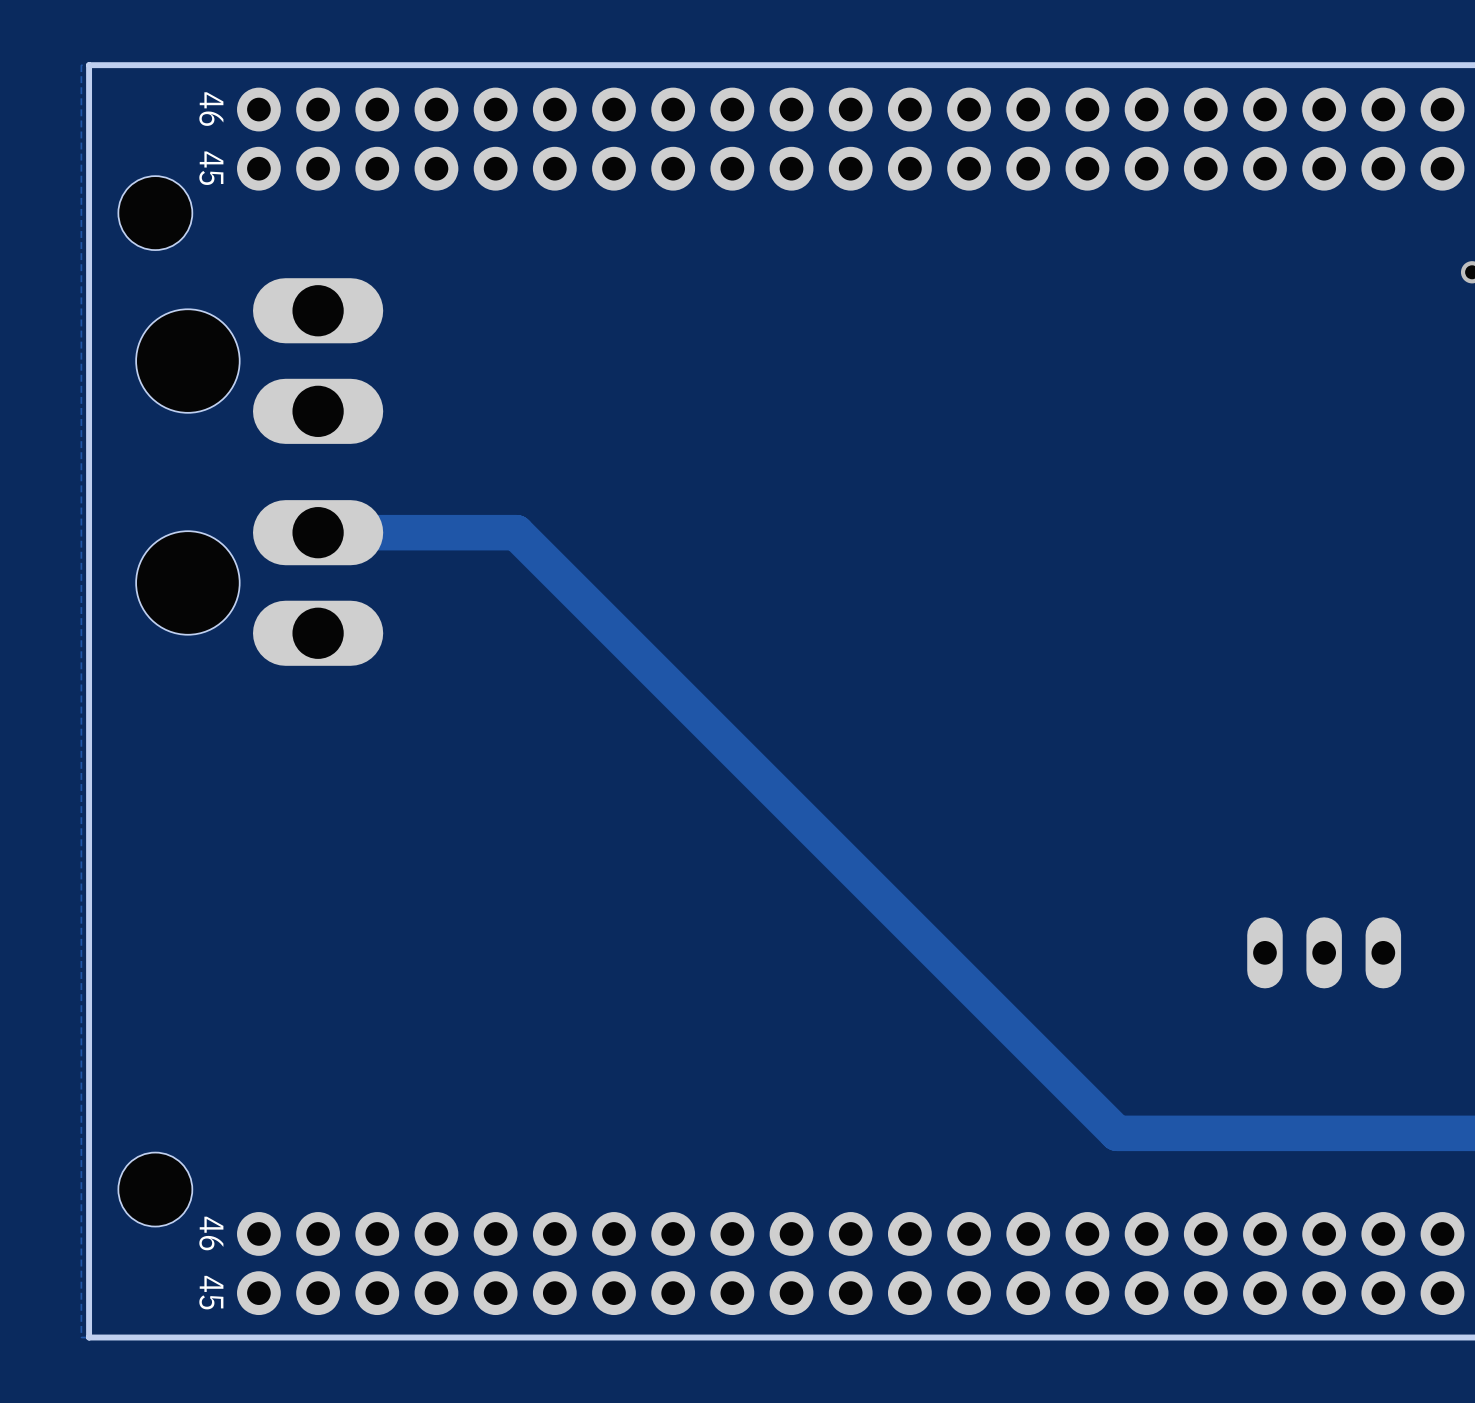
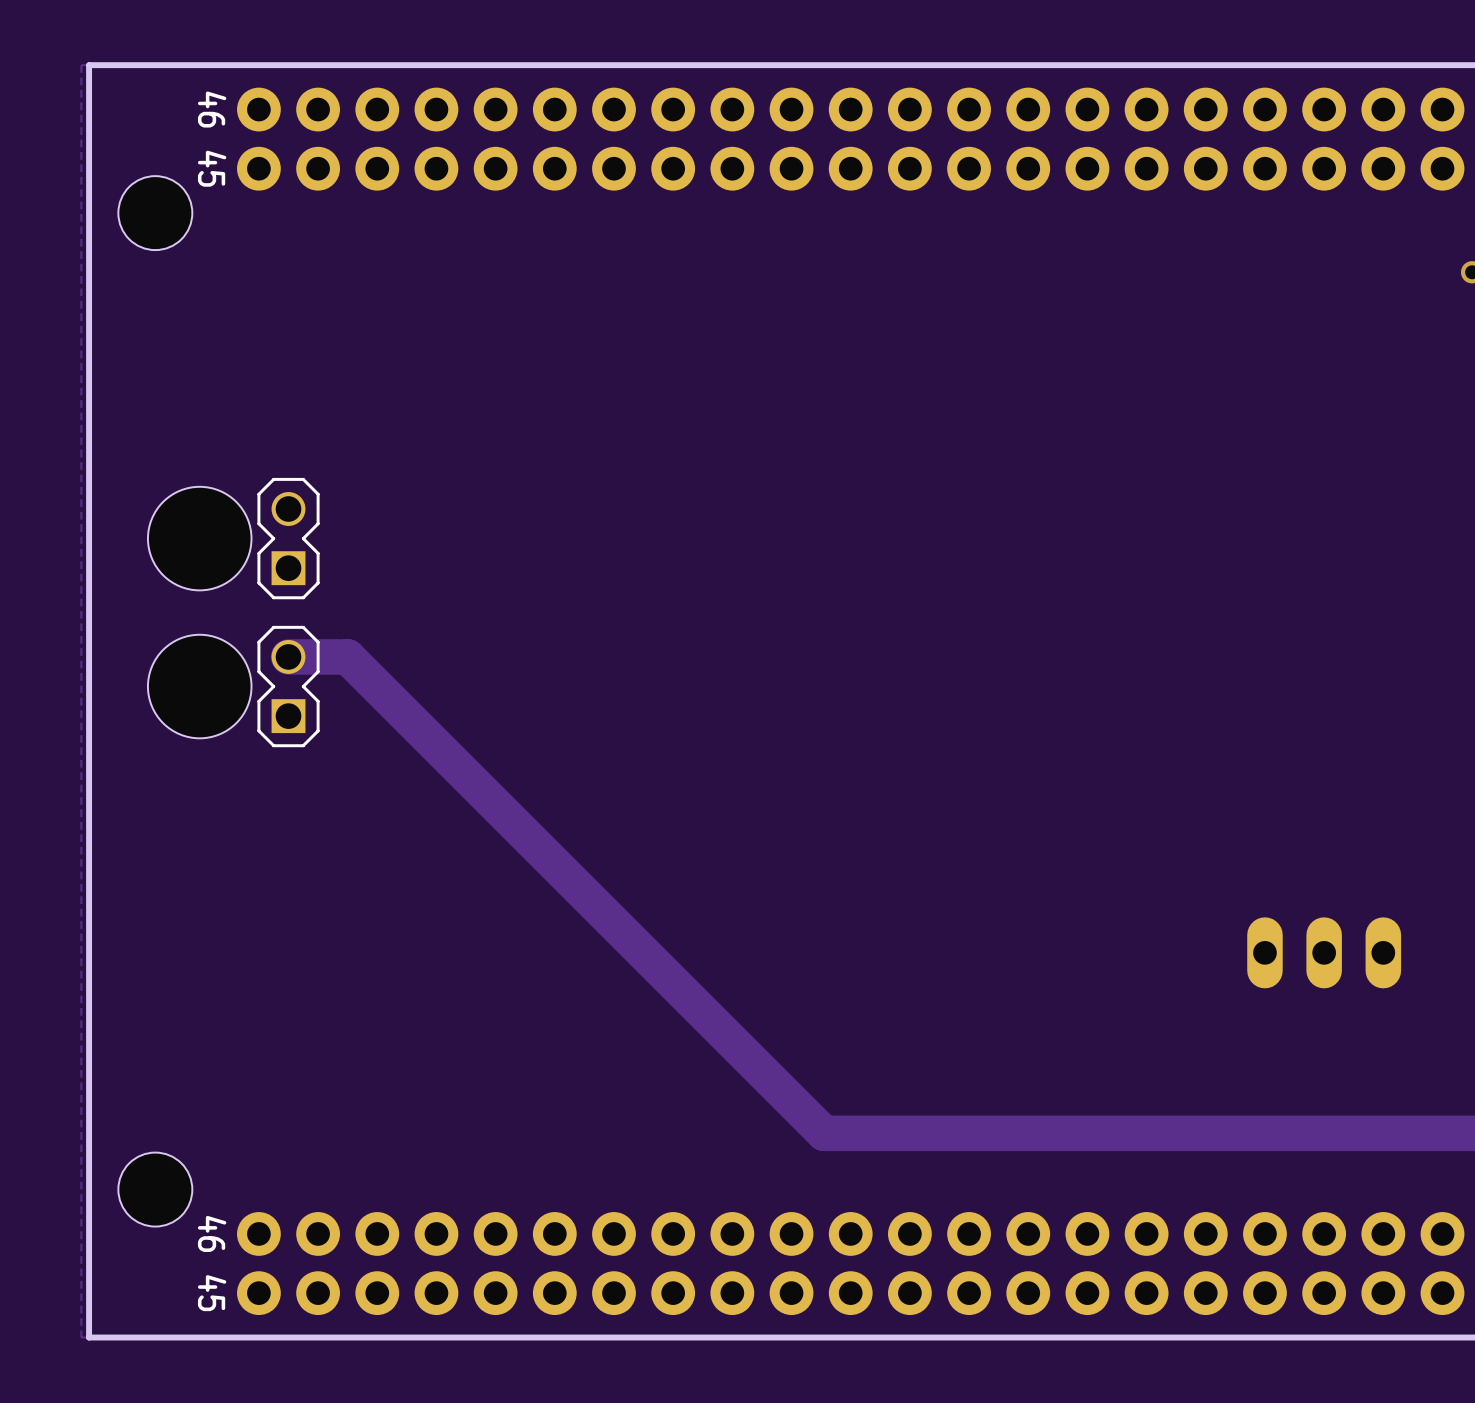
part: (259, 361) -> none
track: (318, 532) (516, 532) (1117, 1133) -> (288, 656) (347, 656) (824, 1133) (1117, 1133)
part: none -> (233, 538)
part: (259, 582) -> none
part: none -> (233, 686)

